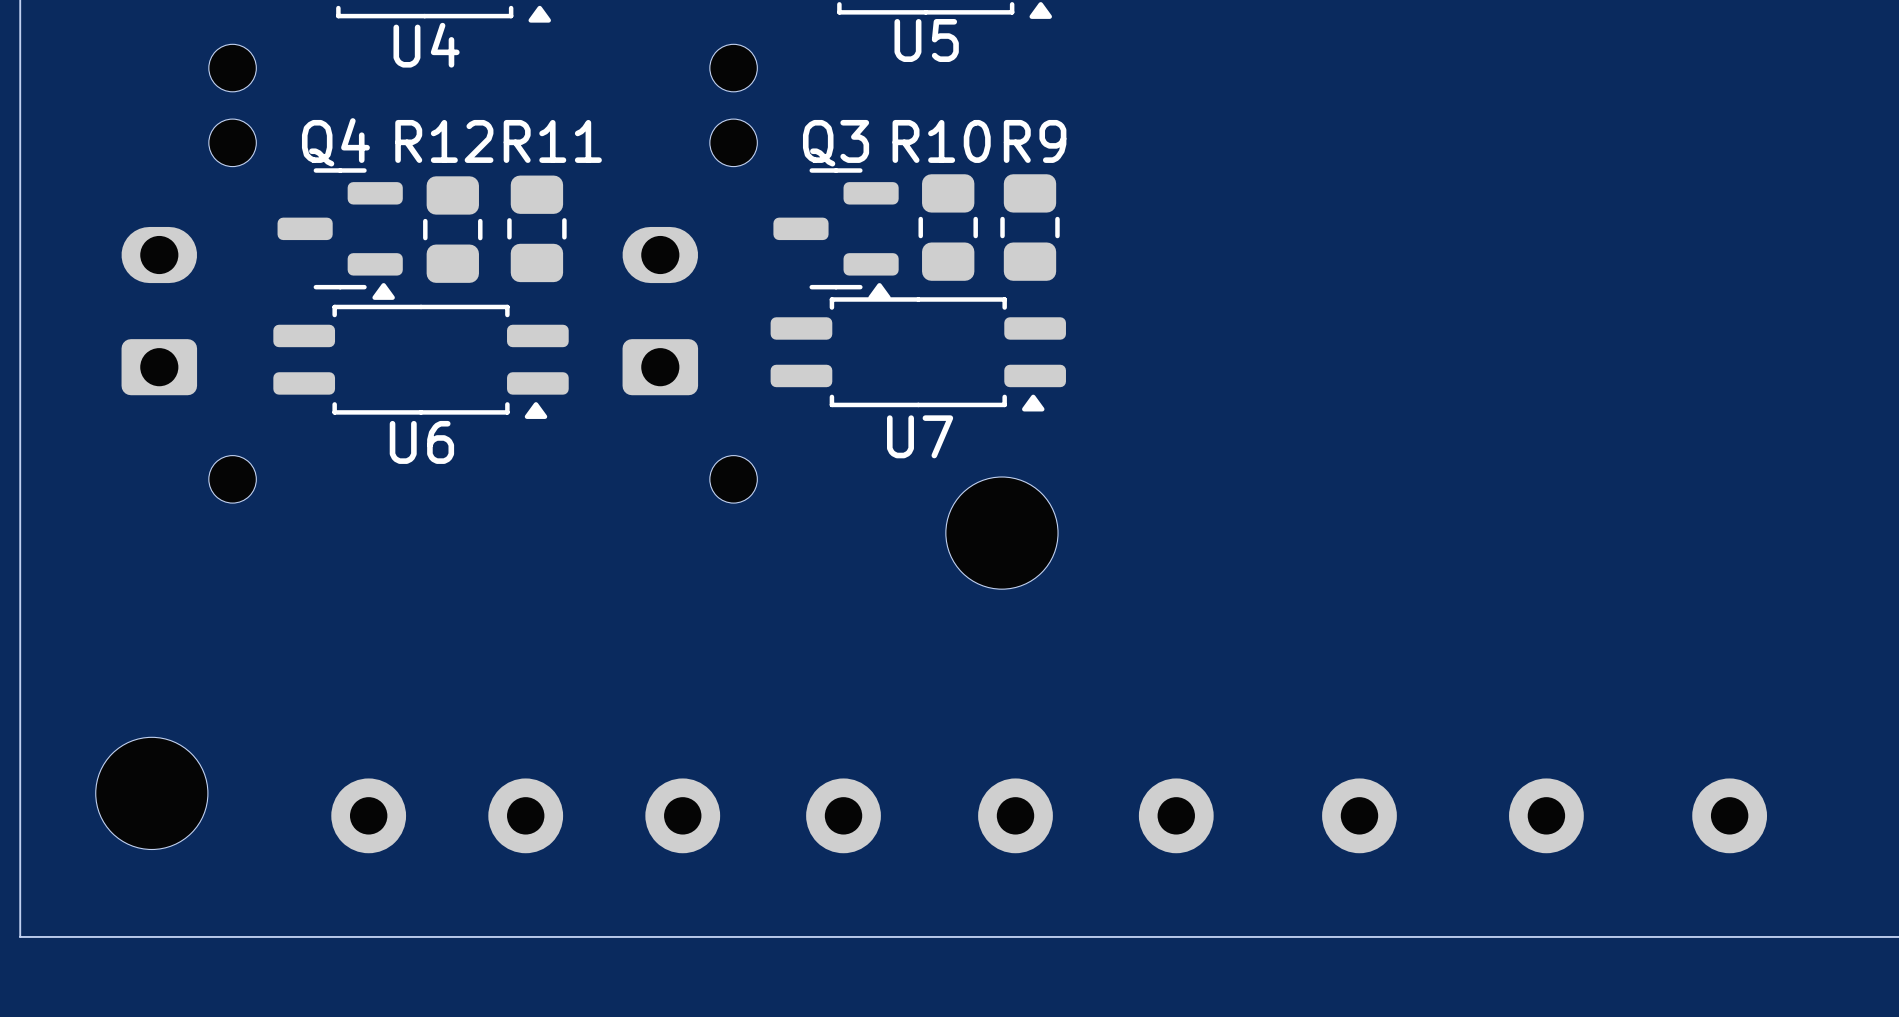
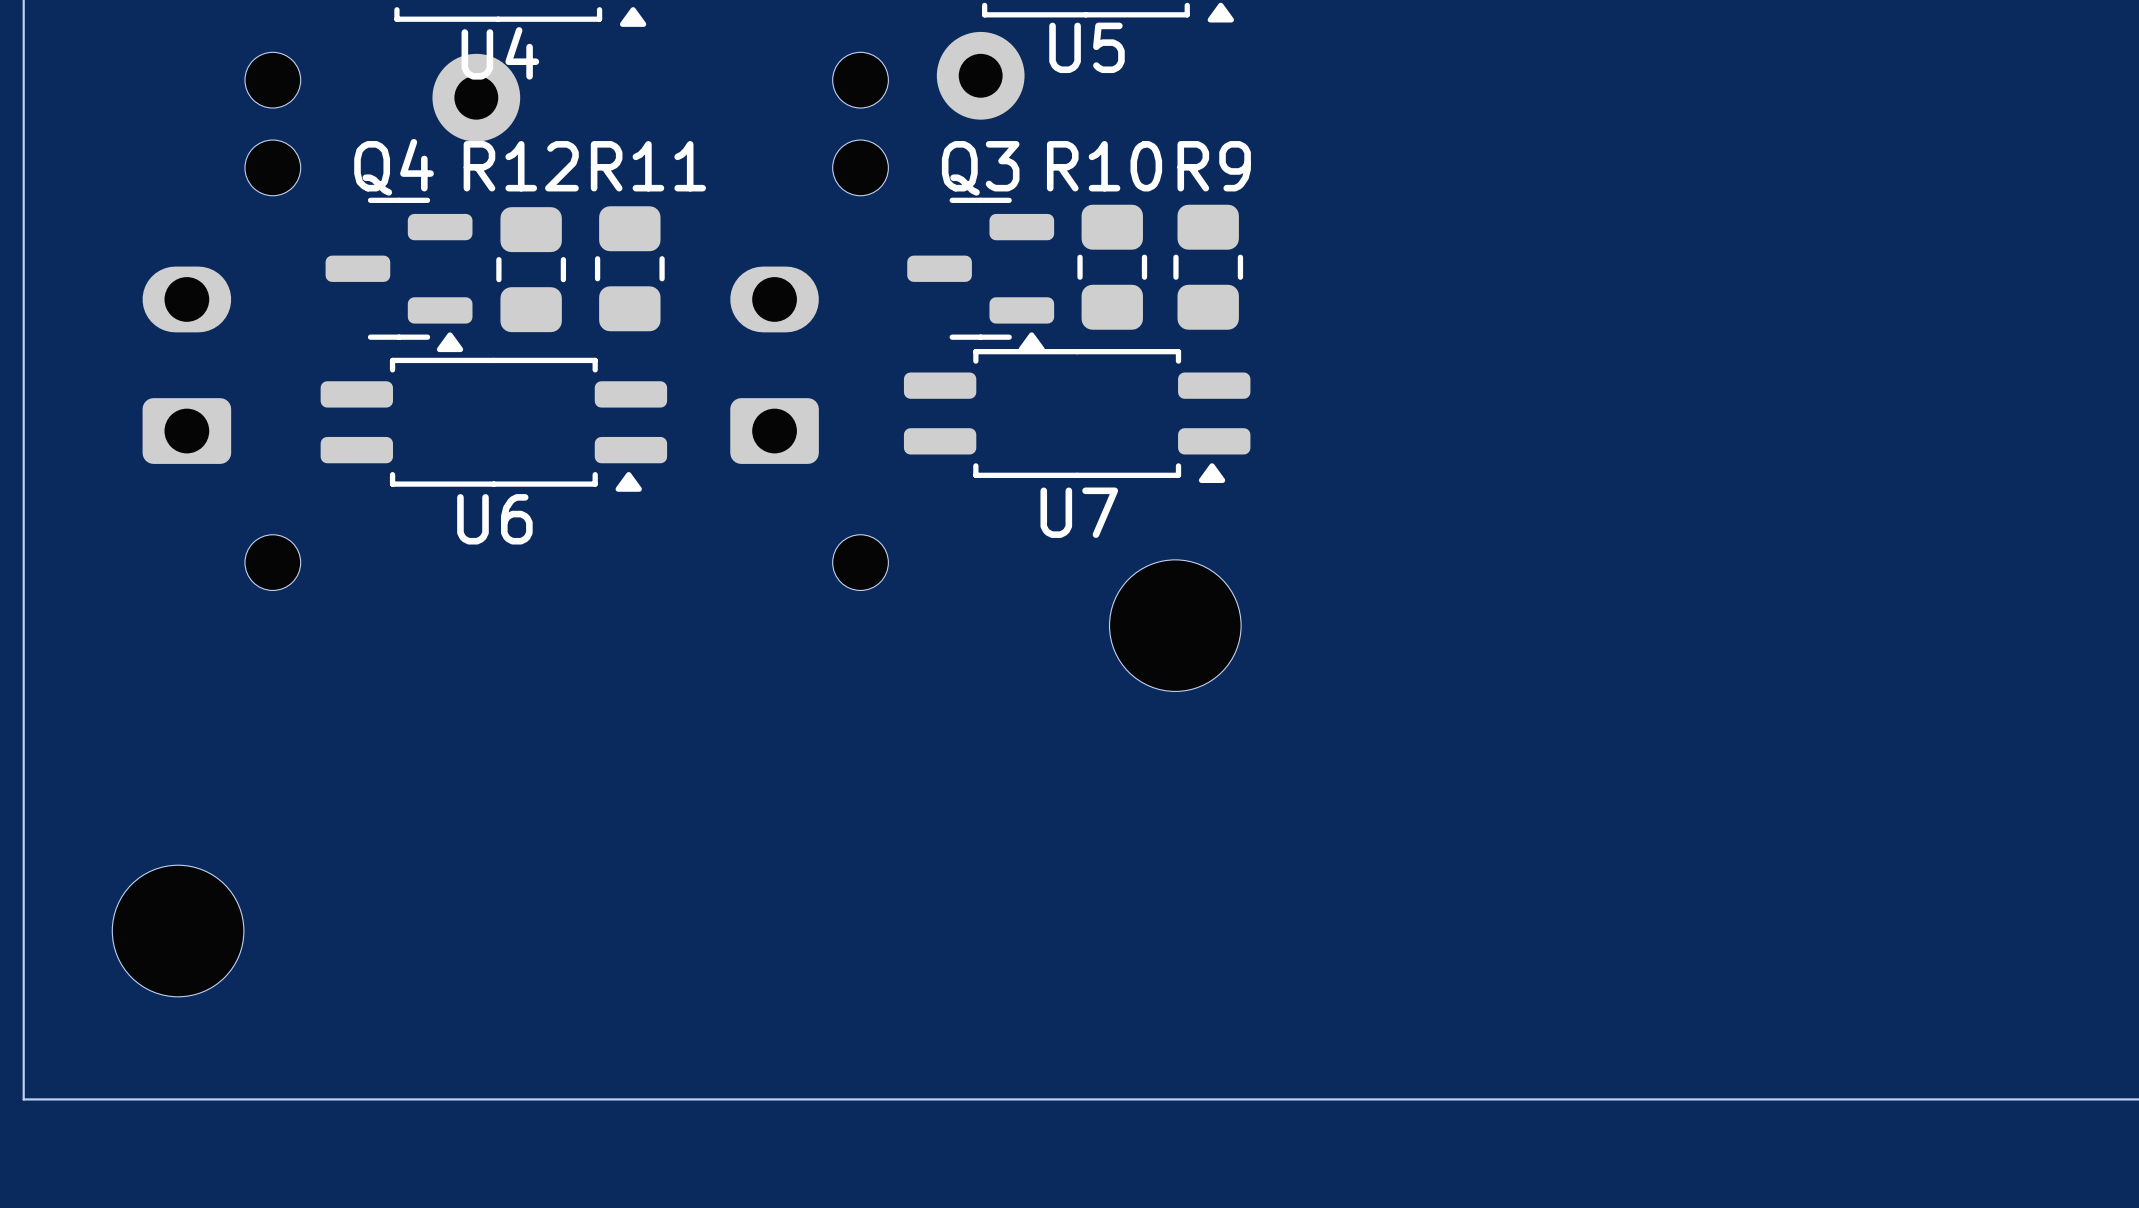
part: none -> (980, 75)
part: none -> (476, 97)
part: (368, 815) -> none
part: (525, 815) -> none
part: (682, 815) -> none
part: (843, 815) -> none
part: (1015, 815) -> none
part: (1176, 815) -> none
part: (1359, 815) -> none
part: (1546, 815) -> none
part: (1729, 815) -> none

